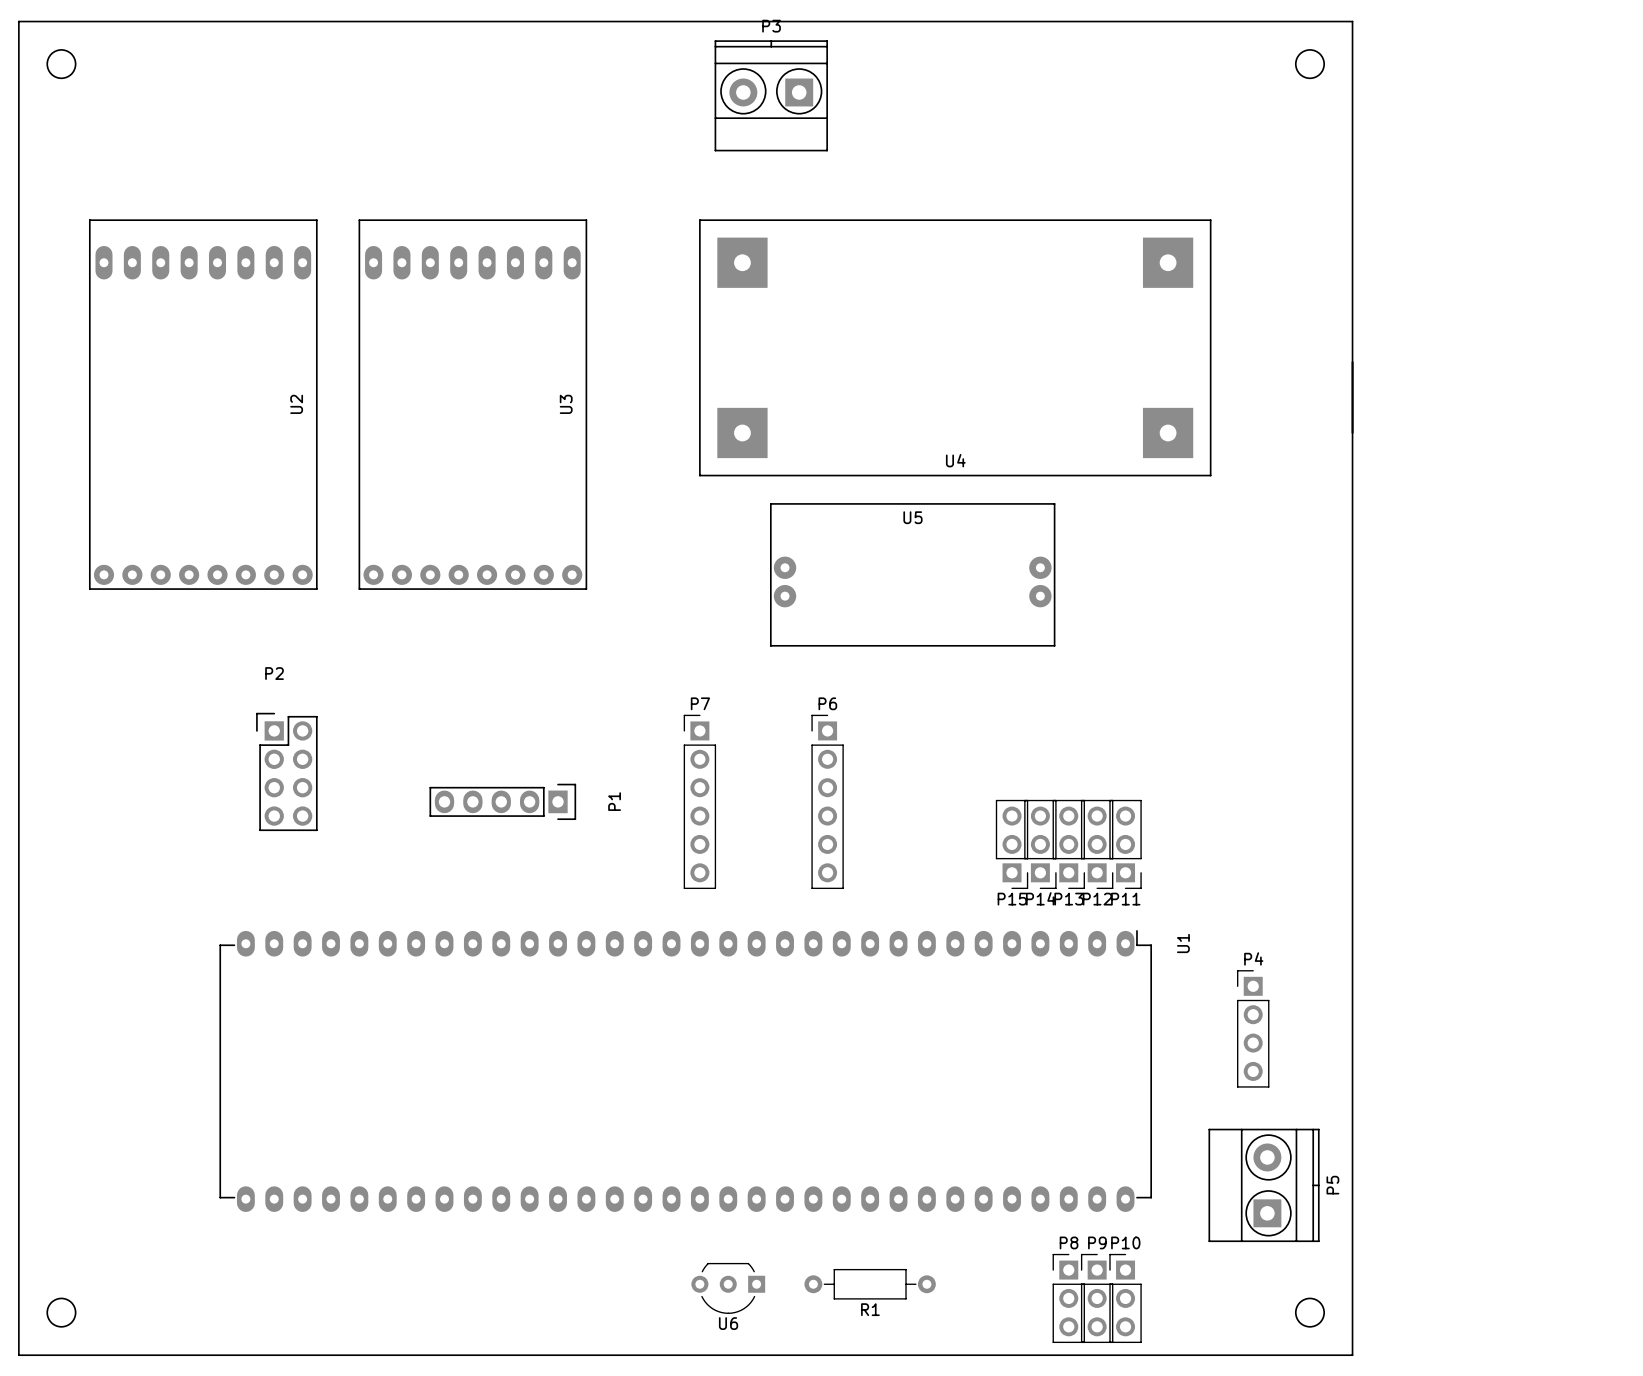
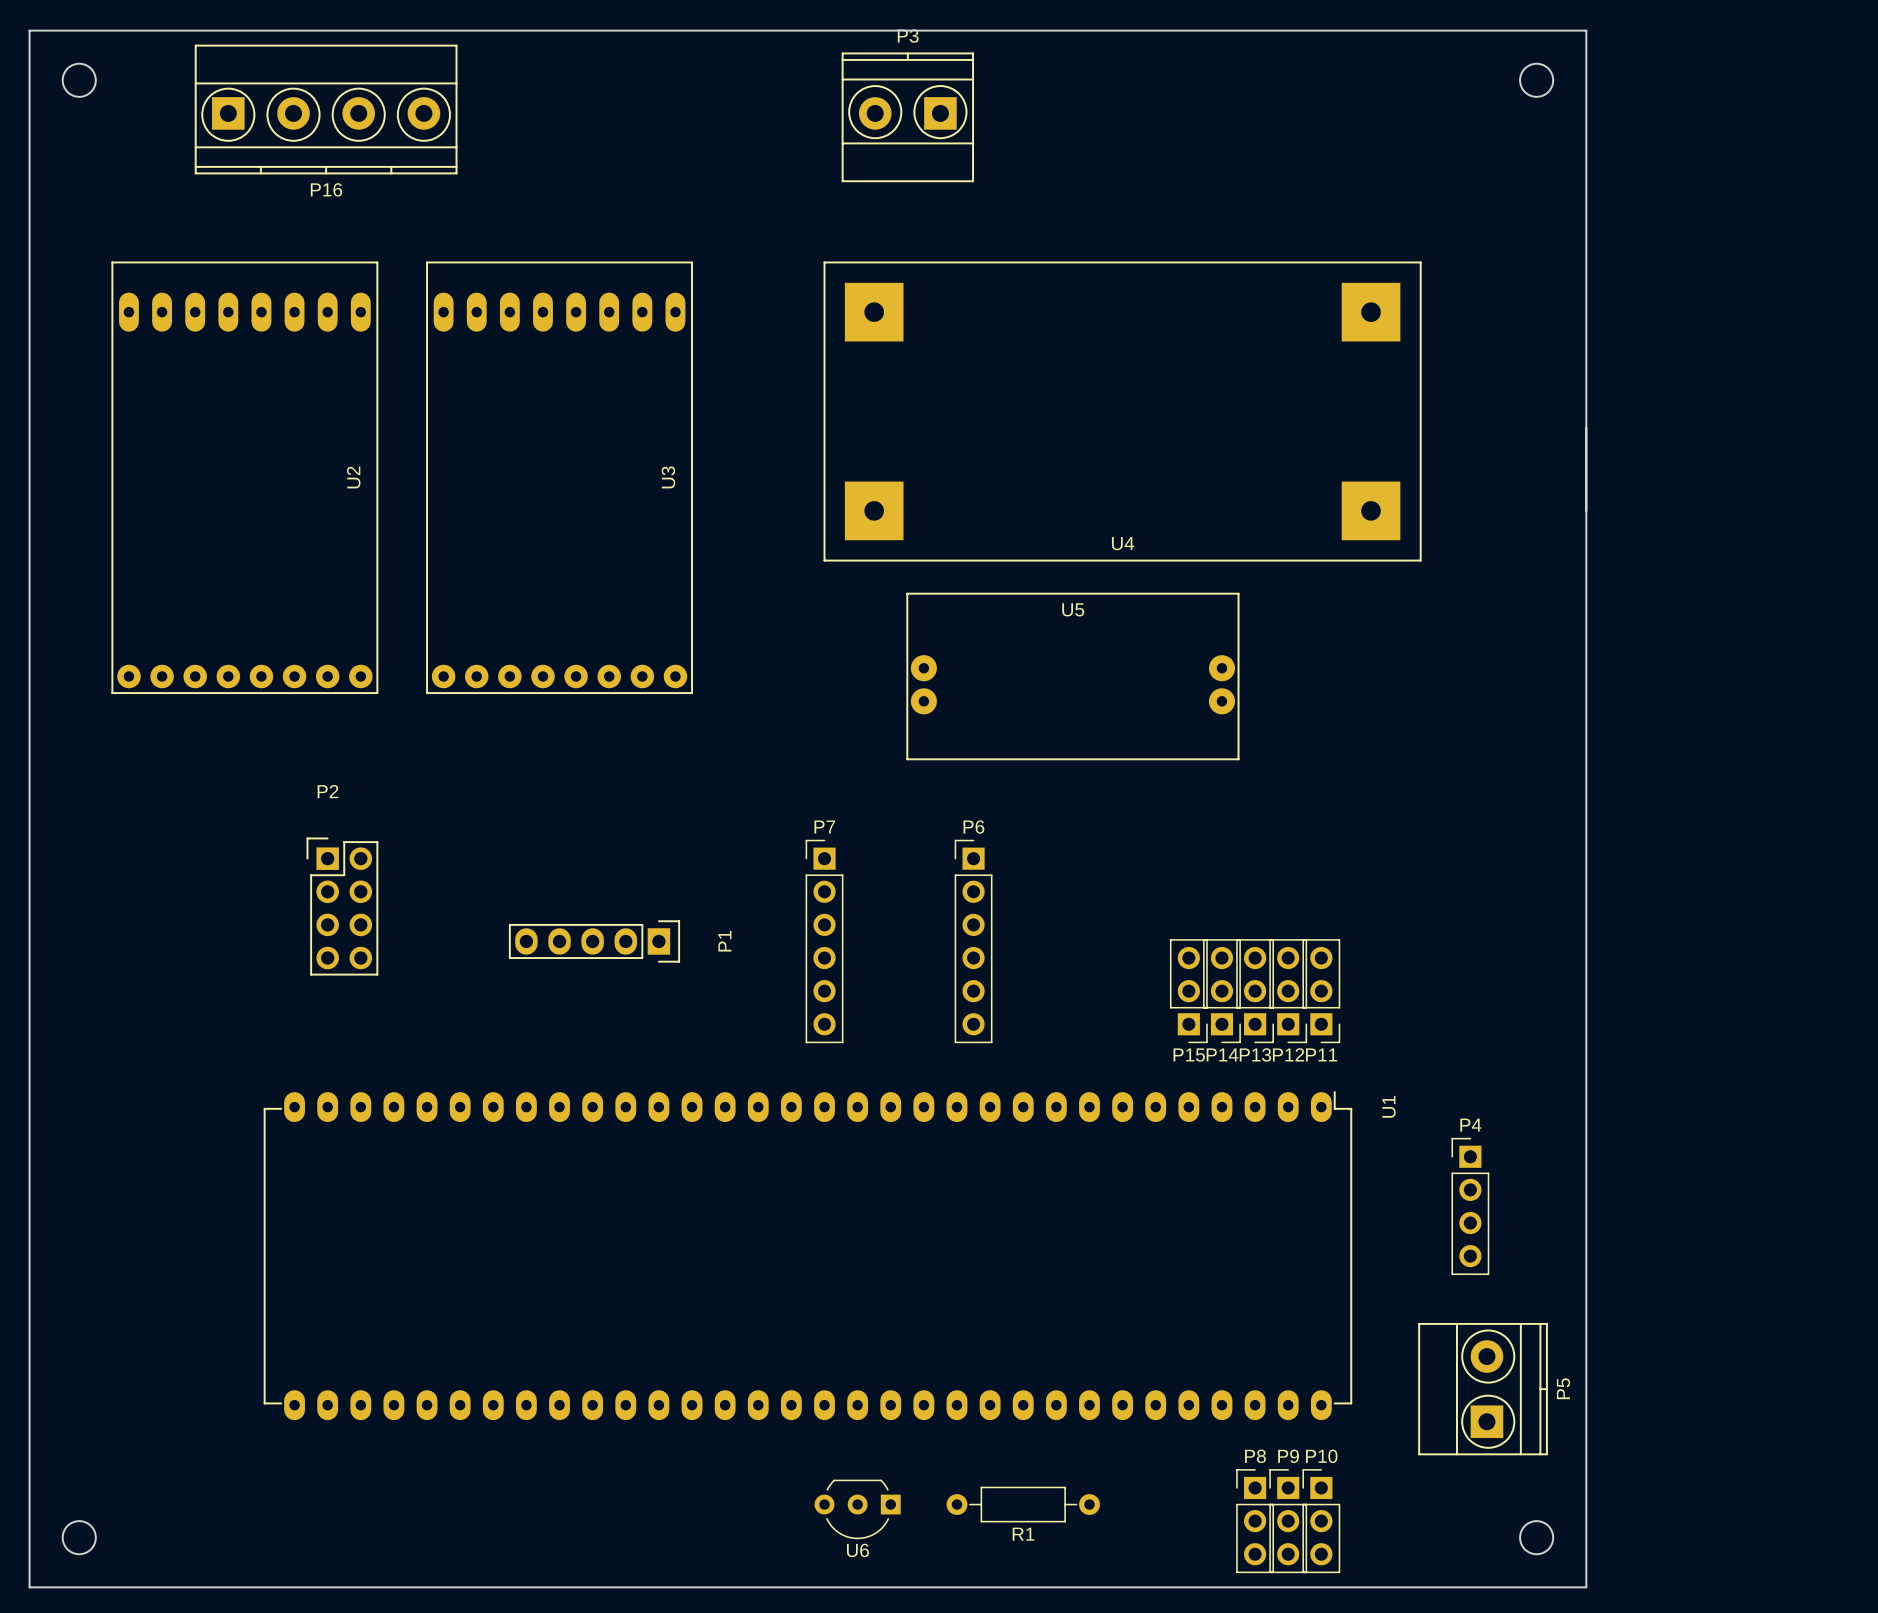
P16: none -> (326, 109)

